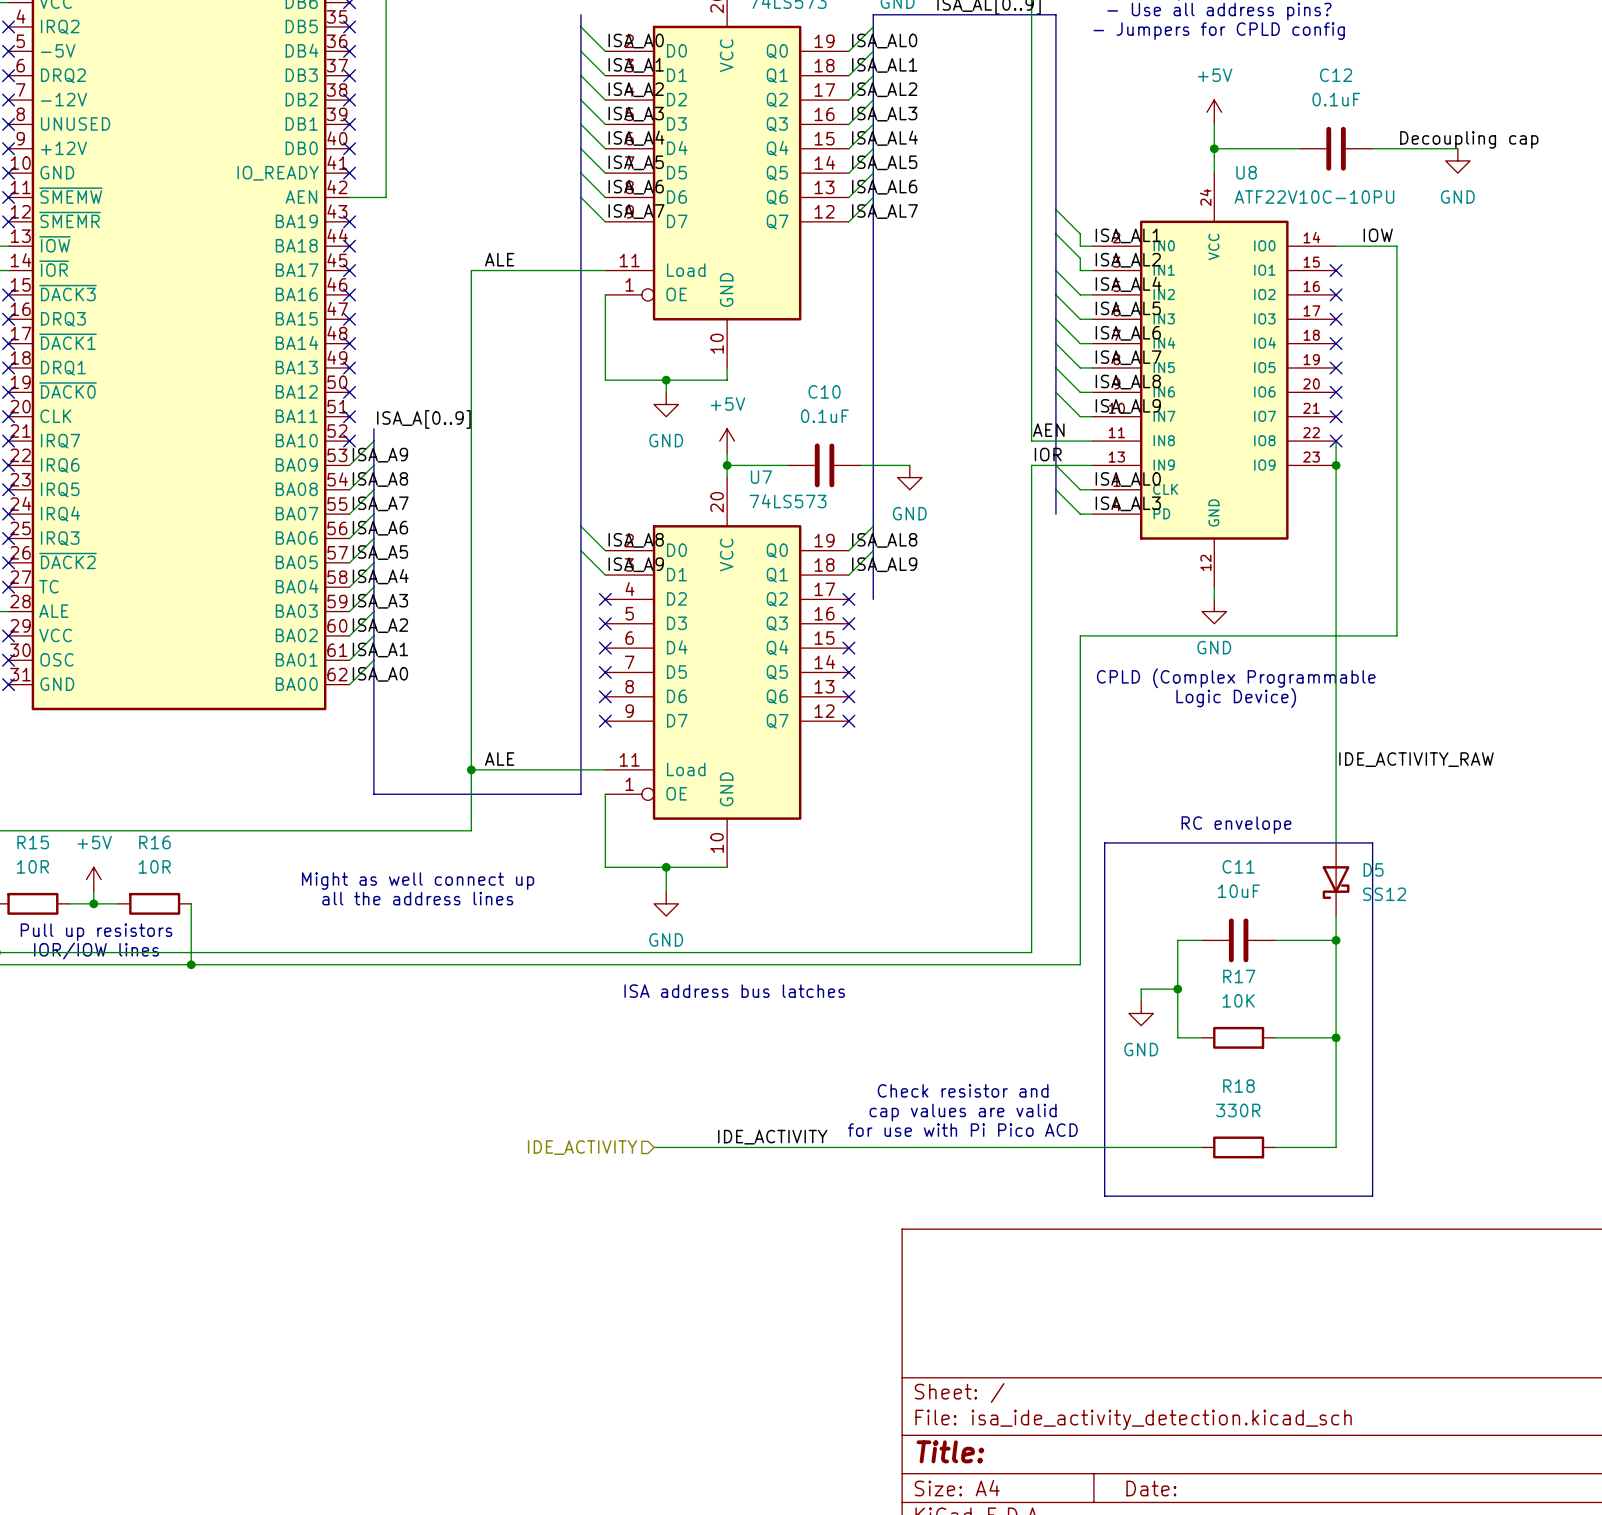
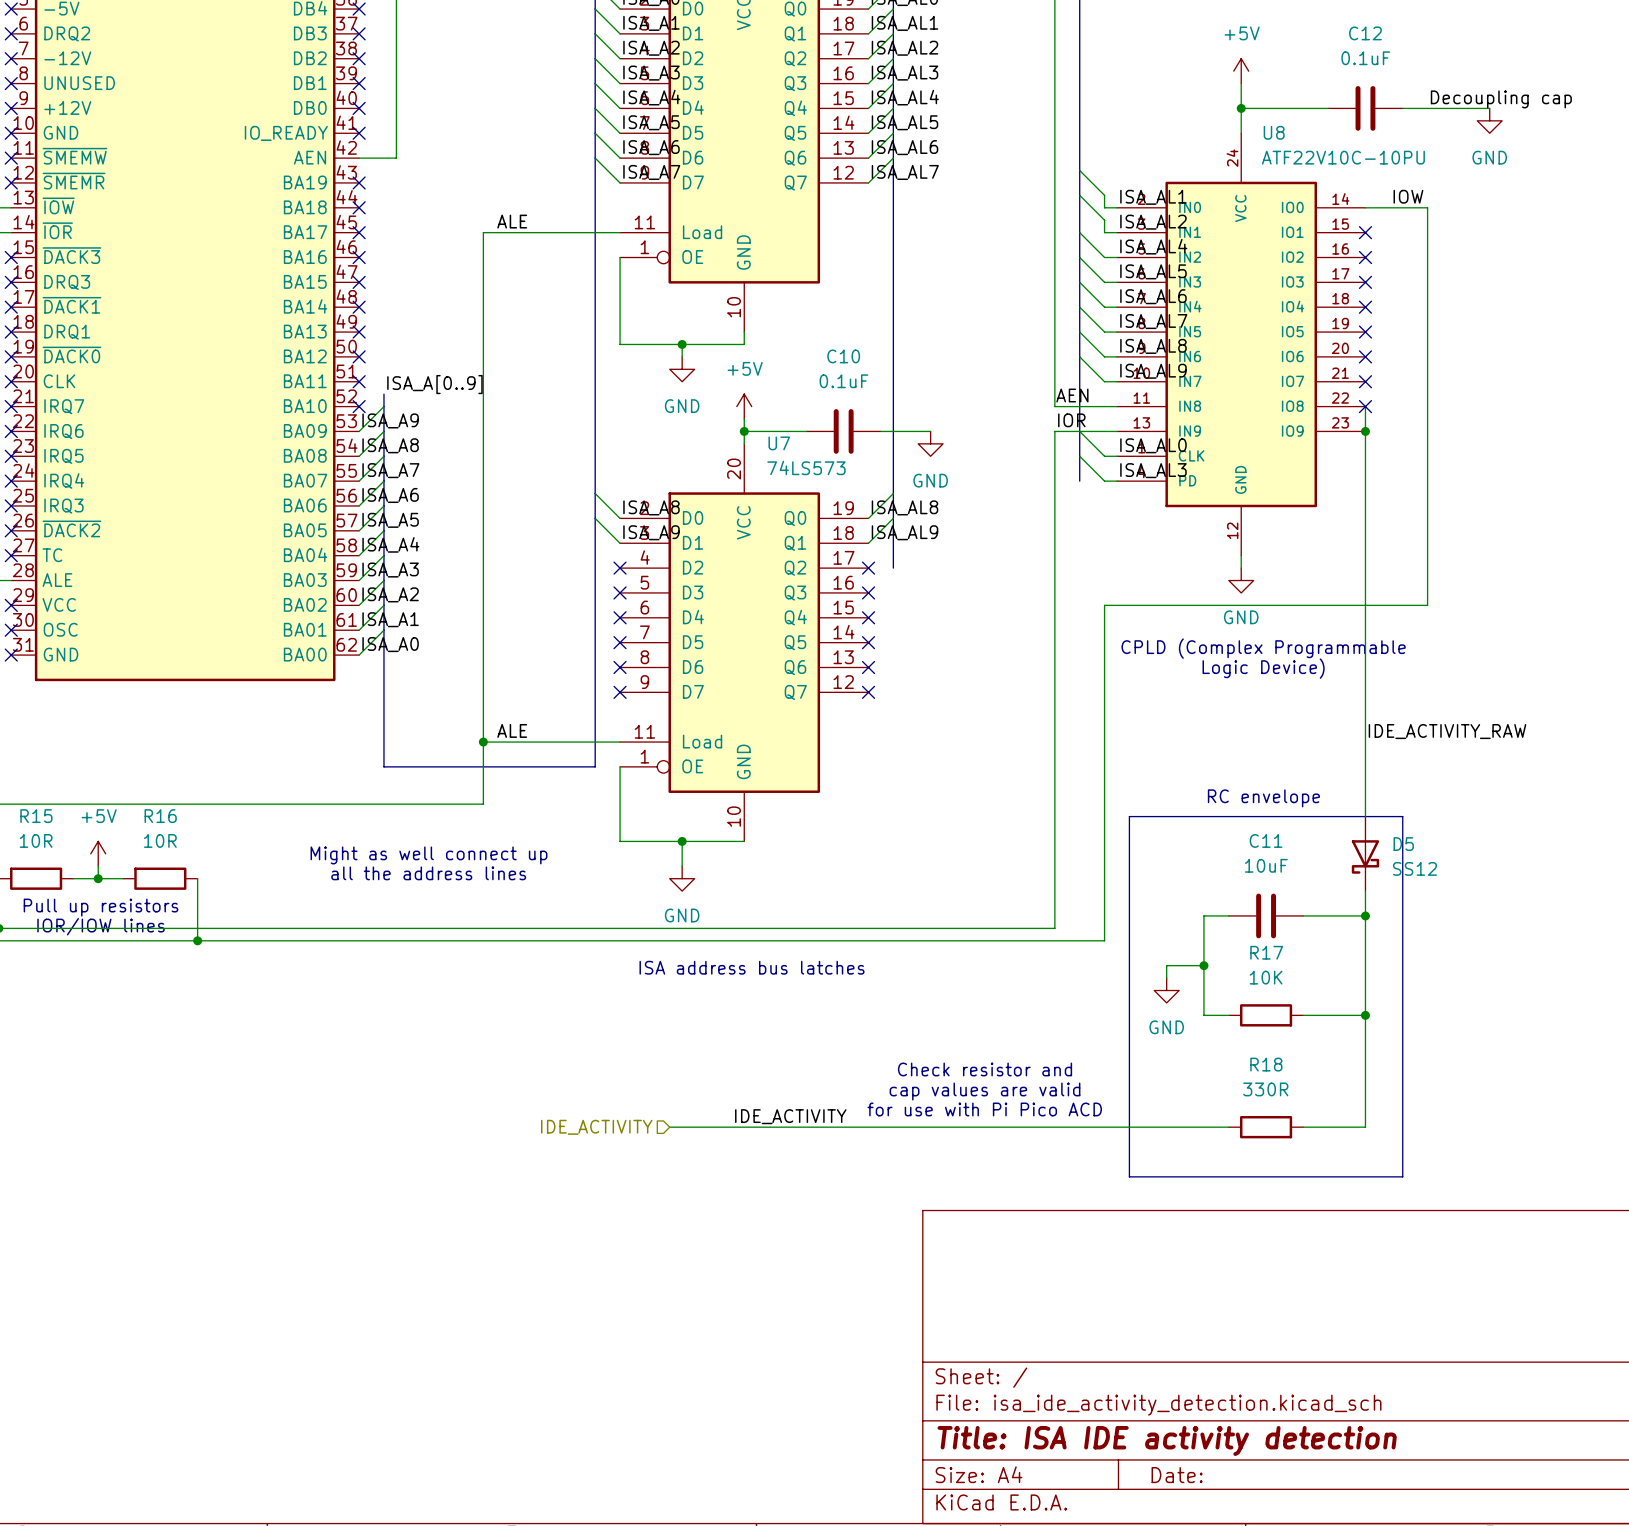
title block: Title: (950, 1451) -> Title: ISA IDE activity detection (1167, 1440)

